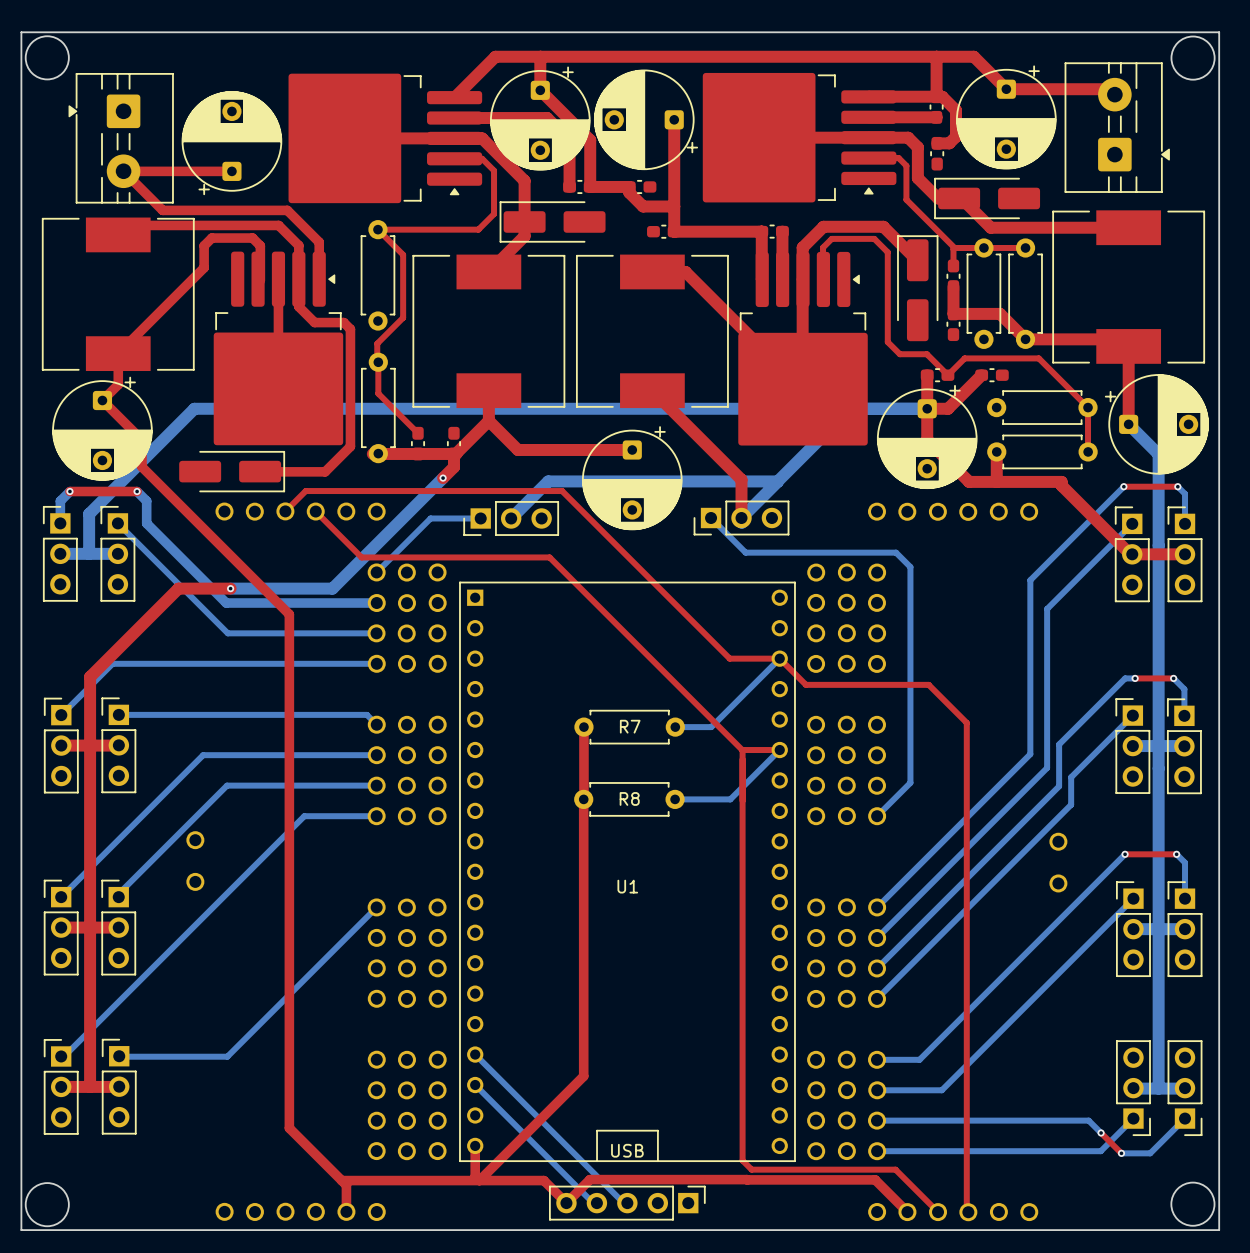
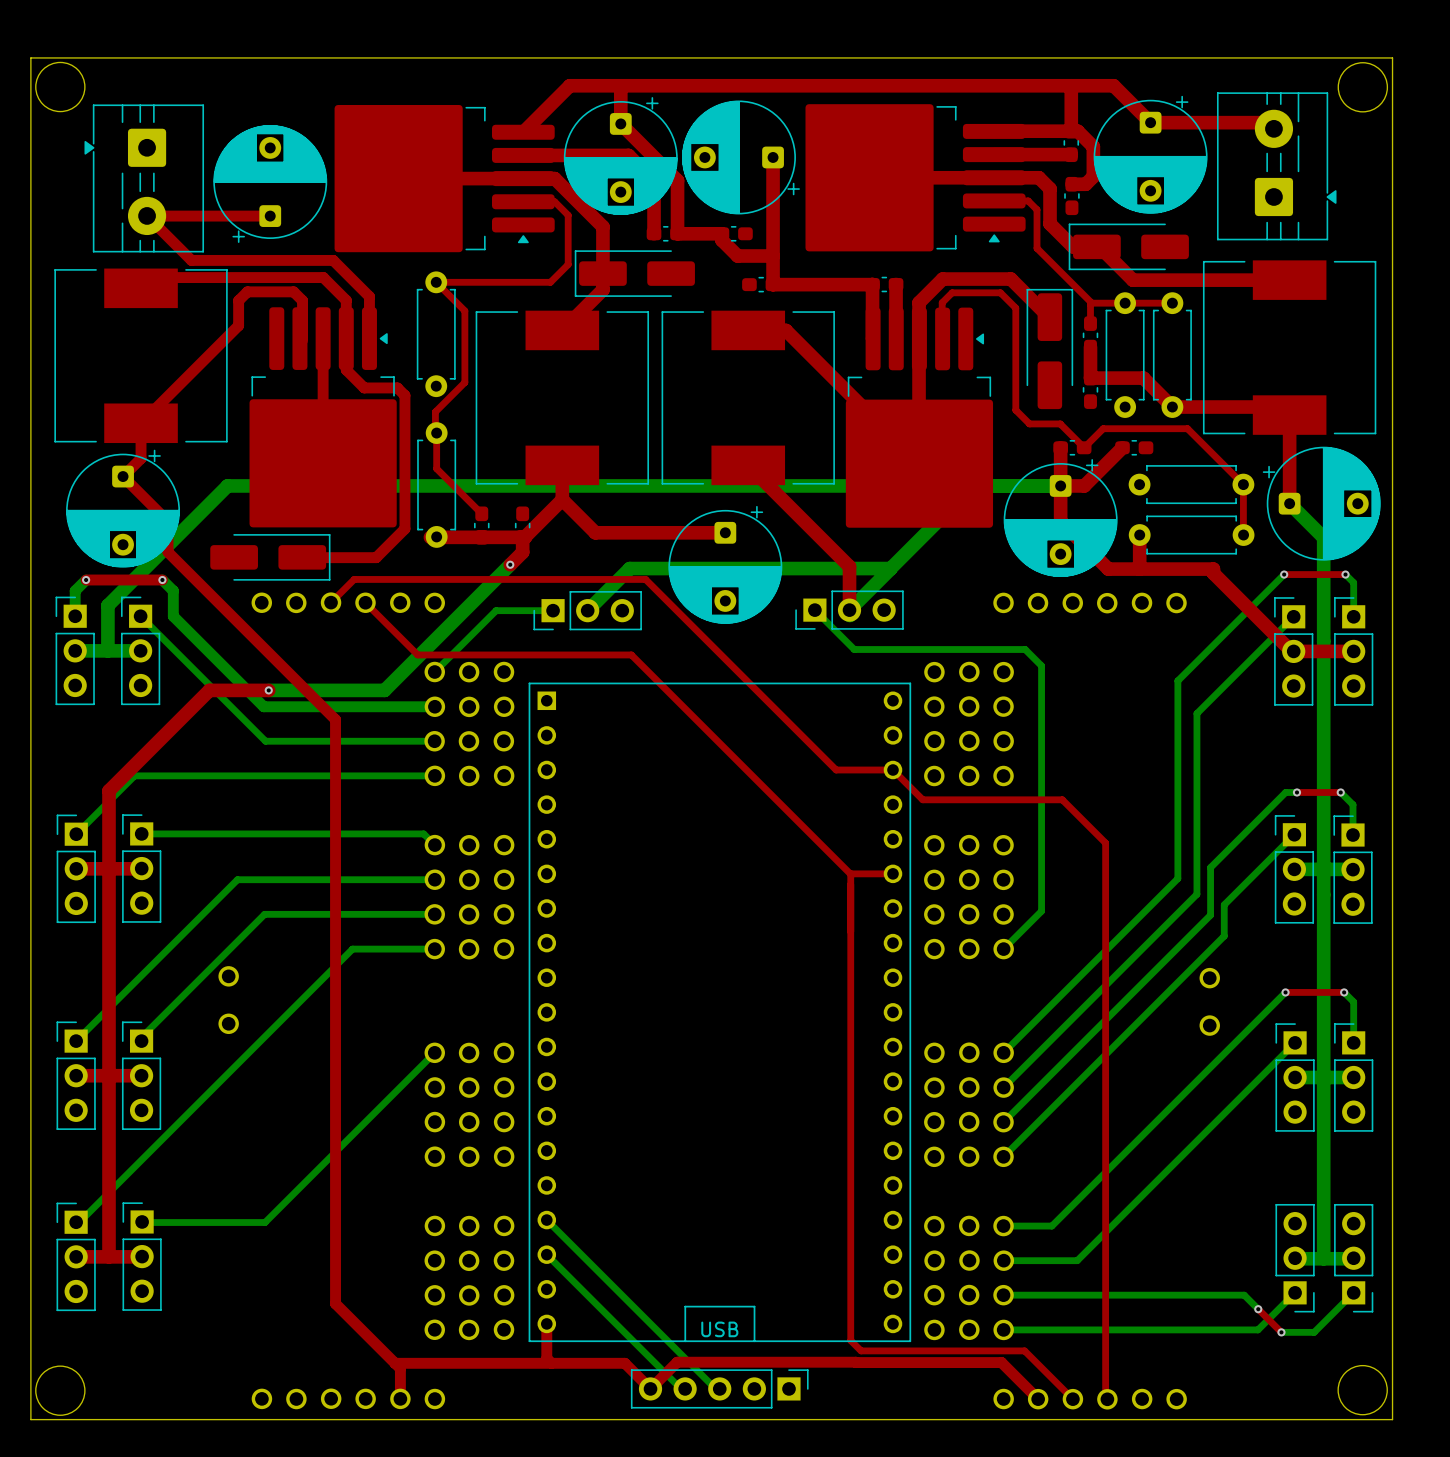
bottom track: (779, 658) (711, 727) (675, 727) -> none
top track: (583, 727) (583, 1076) (479, 1180) -> none
R7: (629, 727) -> none
bottom track: (779, 750) (730, 799) (674, 799) -> none
R8: (629, 799) -> none
U1 name: U1 (627, 886) -> none

